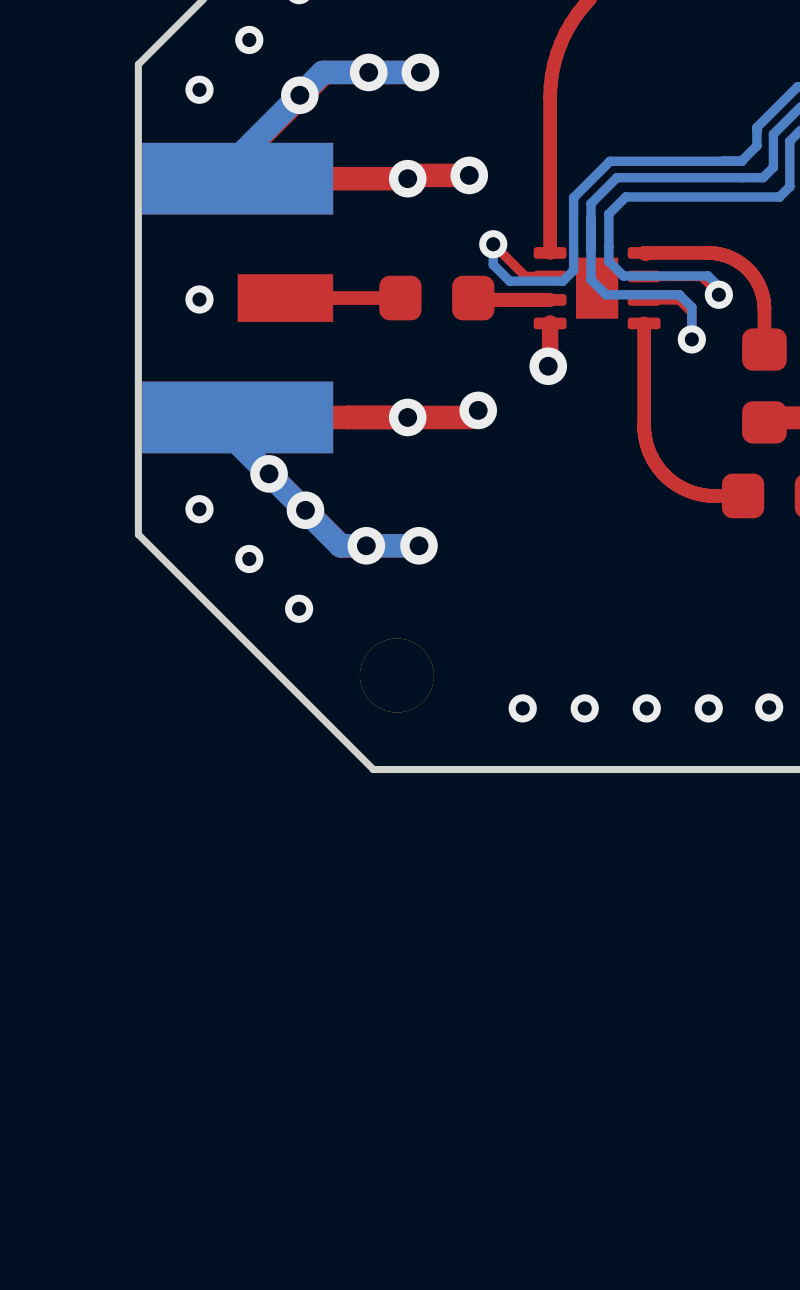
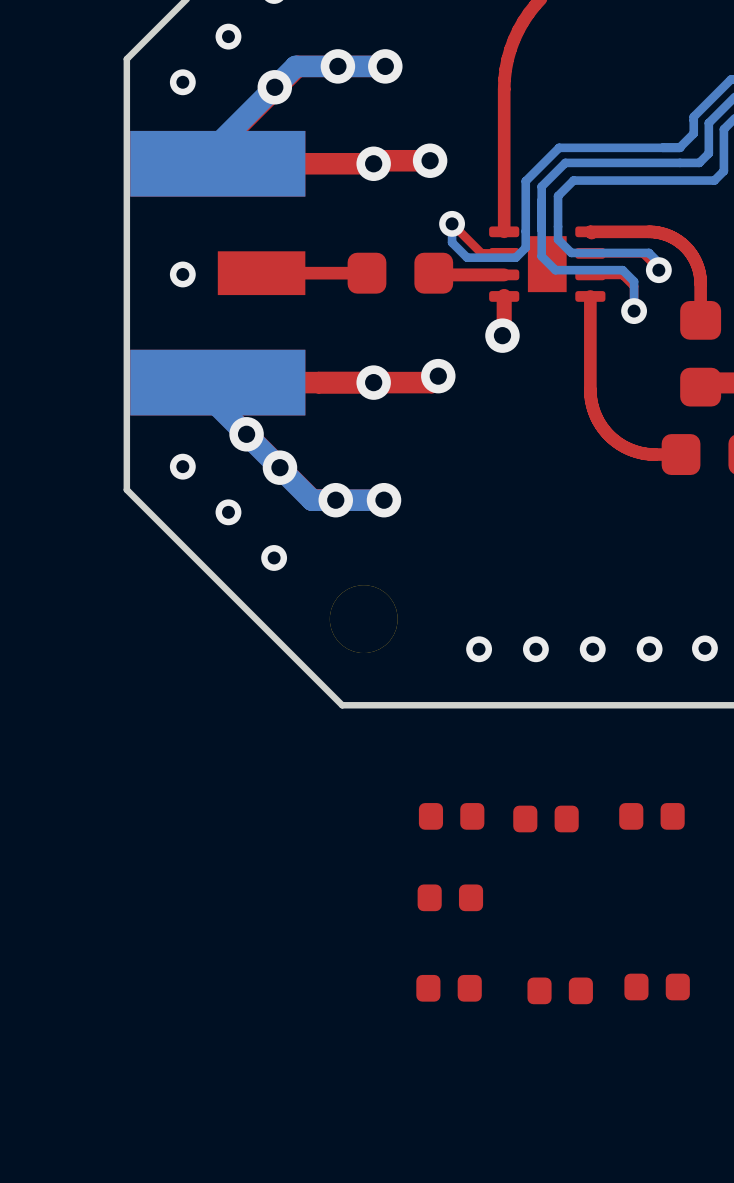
part: none -> (451, 816)
part: none -> (651, 816)
part: none -> (545, 818)
part: none -> (450, 897)
part: none -> (657, 986)
part: none -> (449, 988)
part: none -> (560, 990)

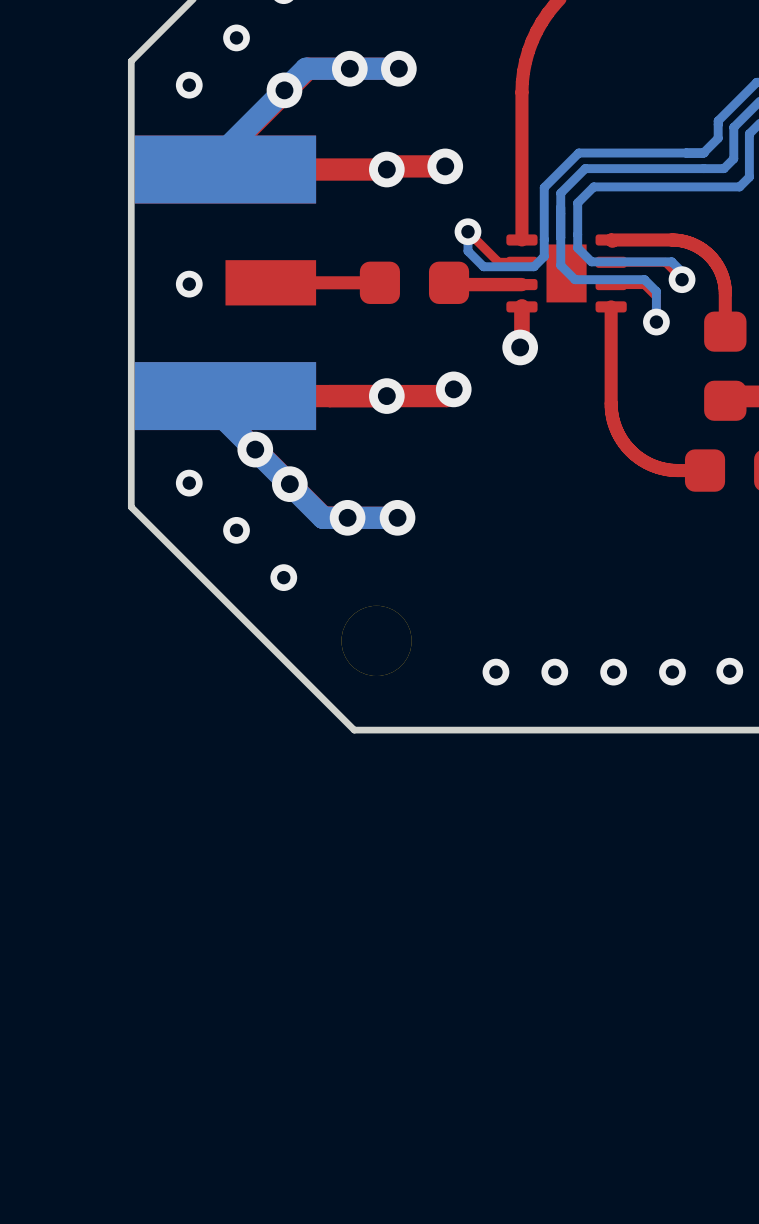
part: (451, 816) -> none
part: (651, 816) -> none
part: (545, 818) -> none
part: (450, 897) -> none
part: (657, 986) -> none
part: (449, 988) -> none
part: (560, 990) -> none

